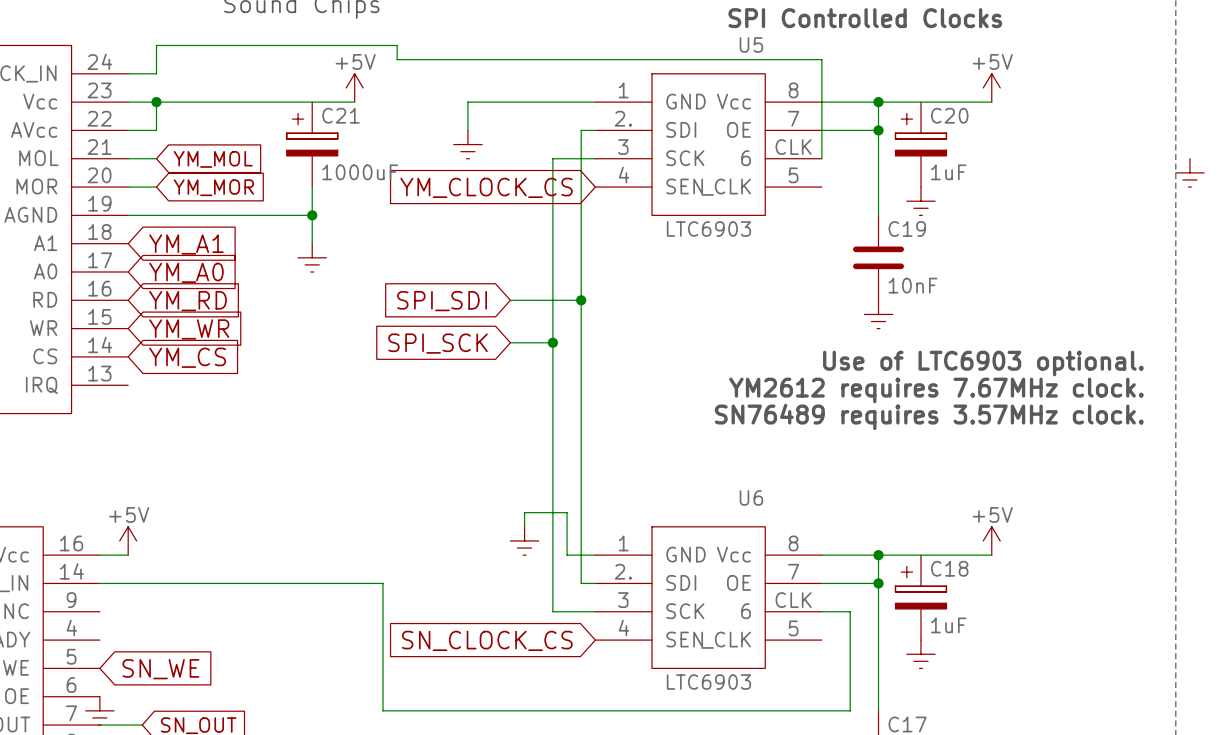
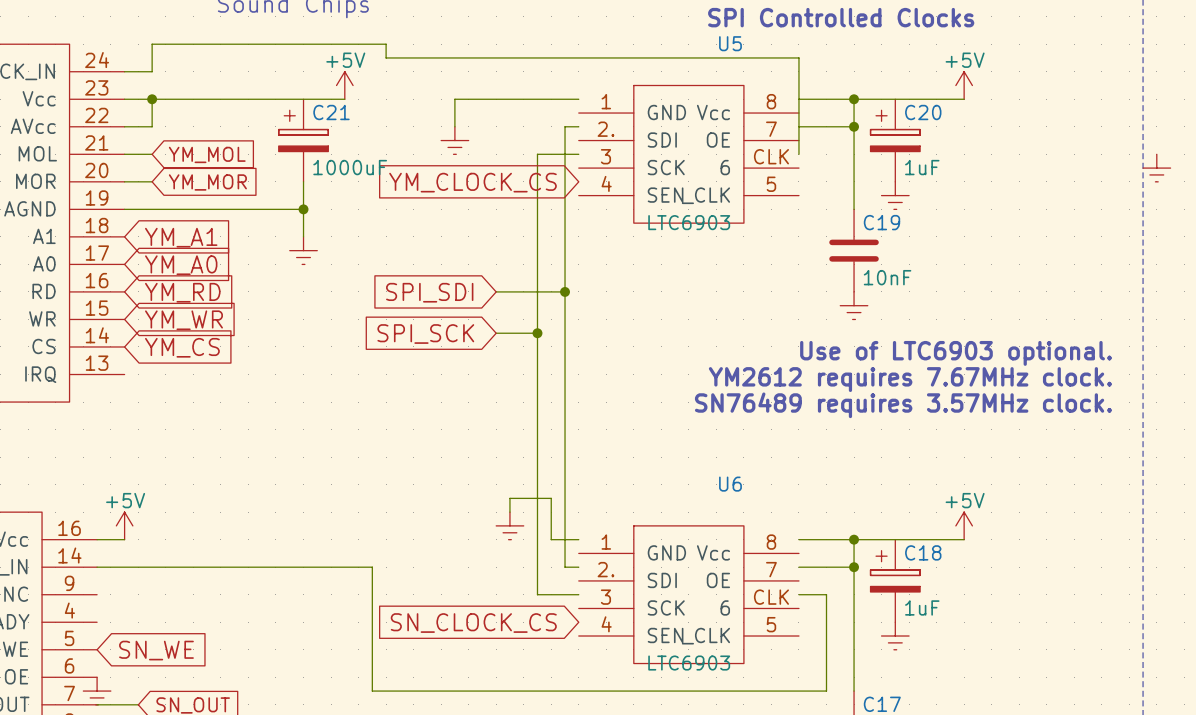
U5 position: (708, 144) -> (688, 154)
U6 position: (708, 597) -> (688, 594)

